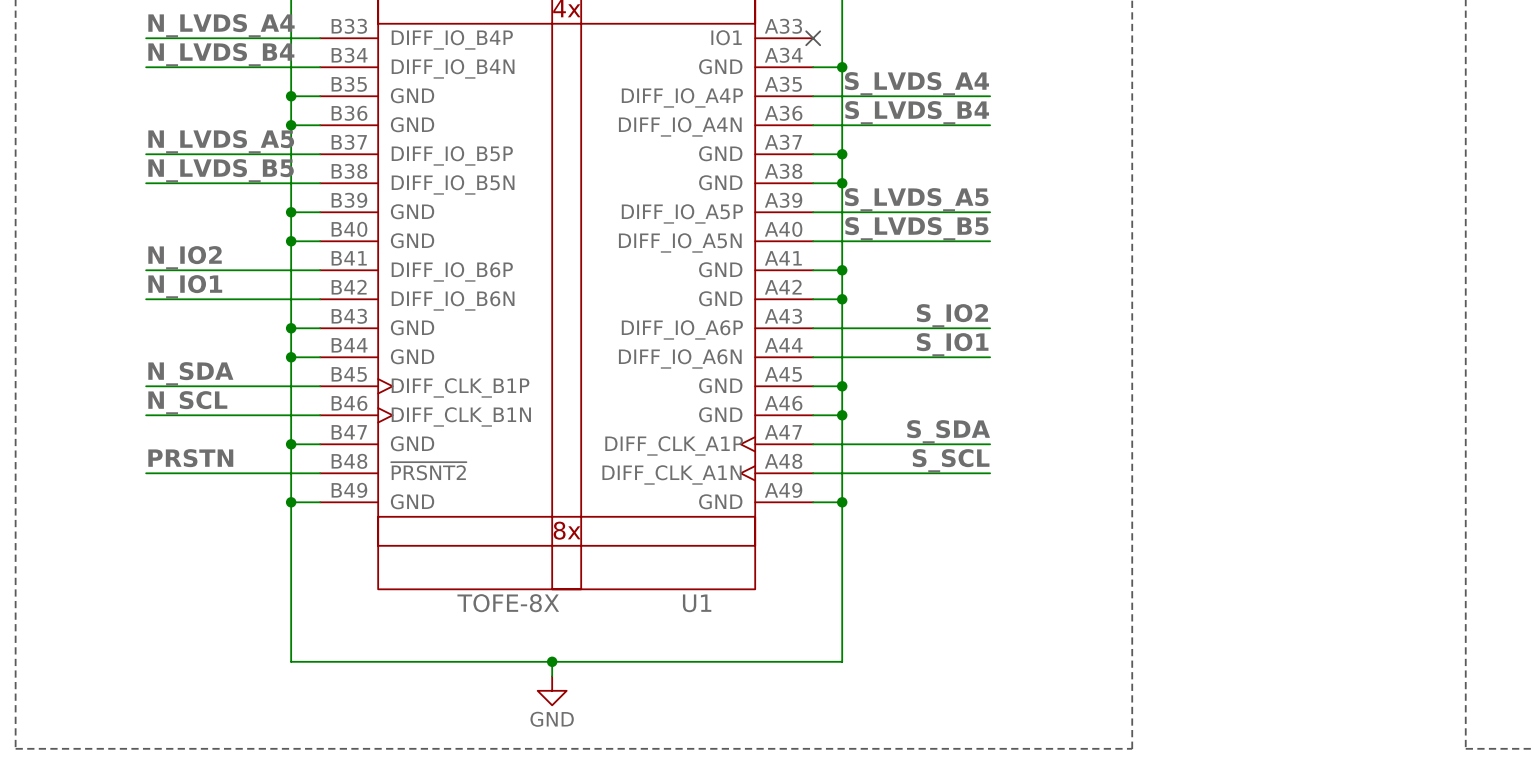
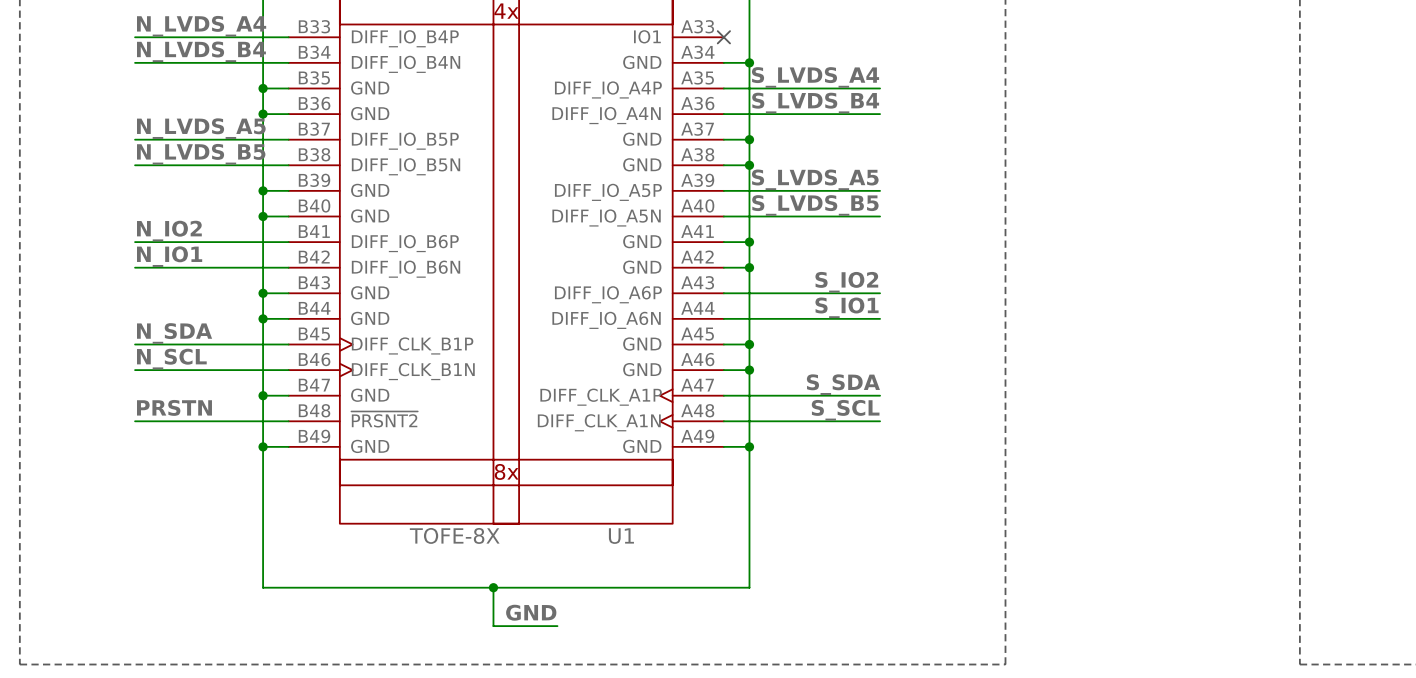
wire: none -> (493, 600) (493, 626) (557, 626)
power symbol: GND (552, 690) -> none
label: none -> GND (531, 612)

